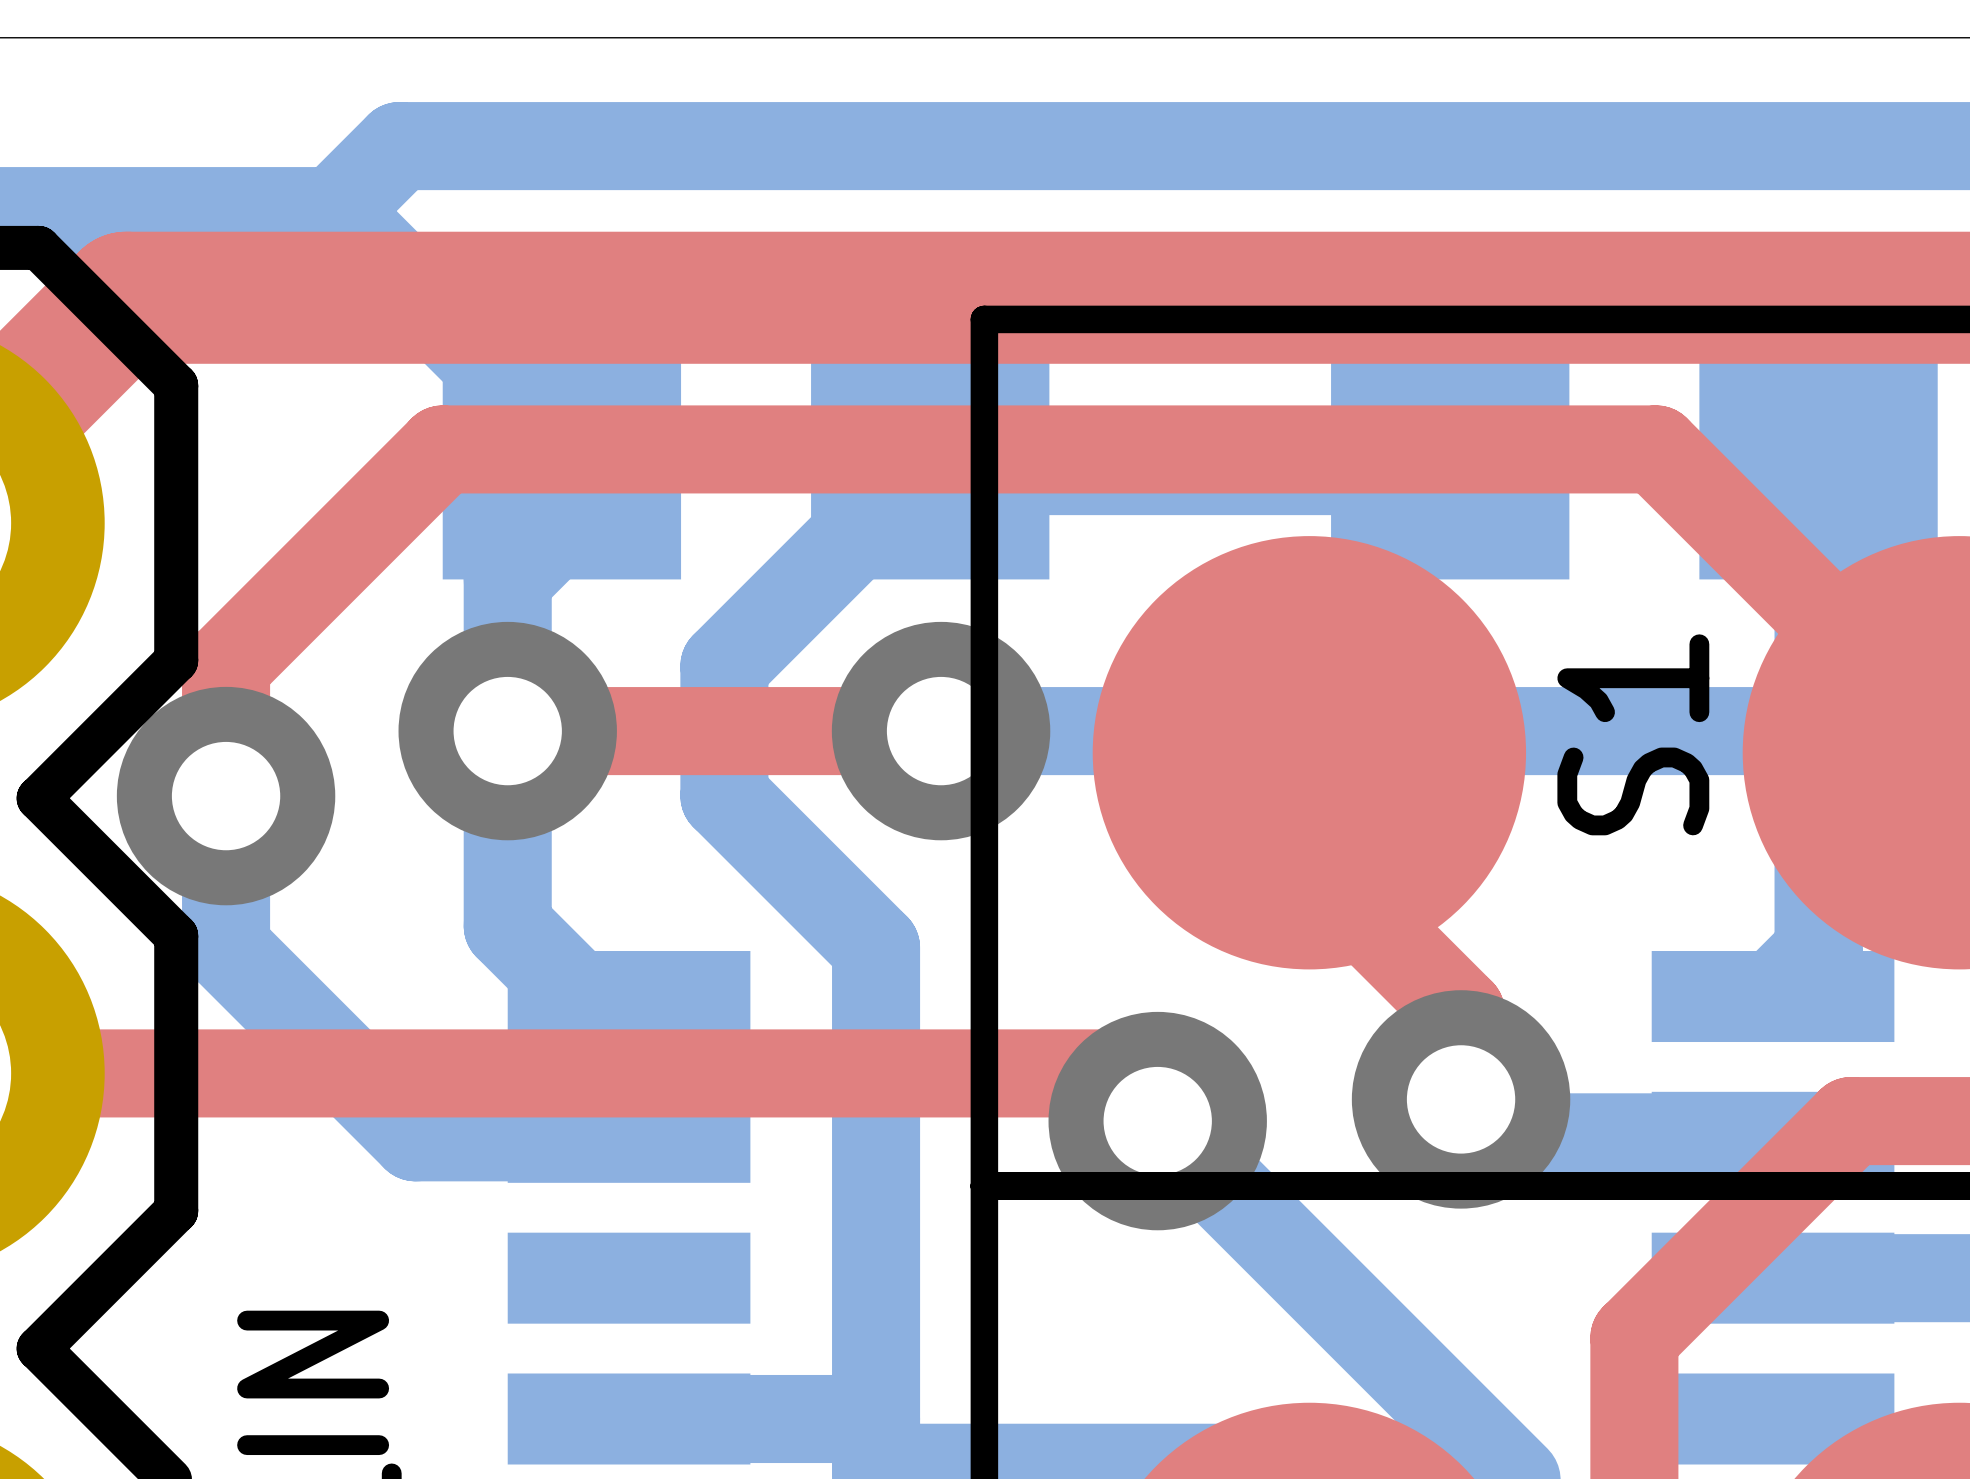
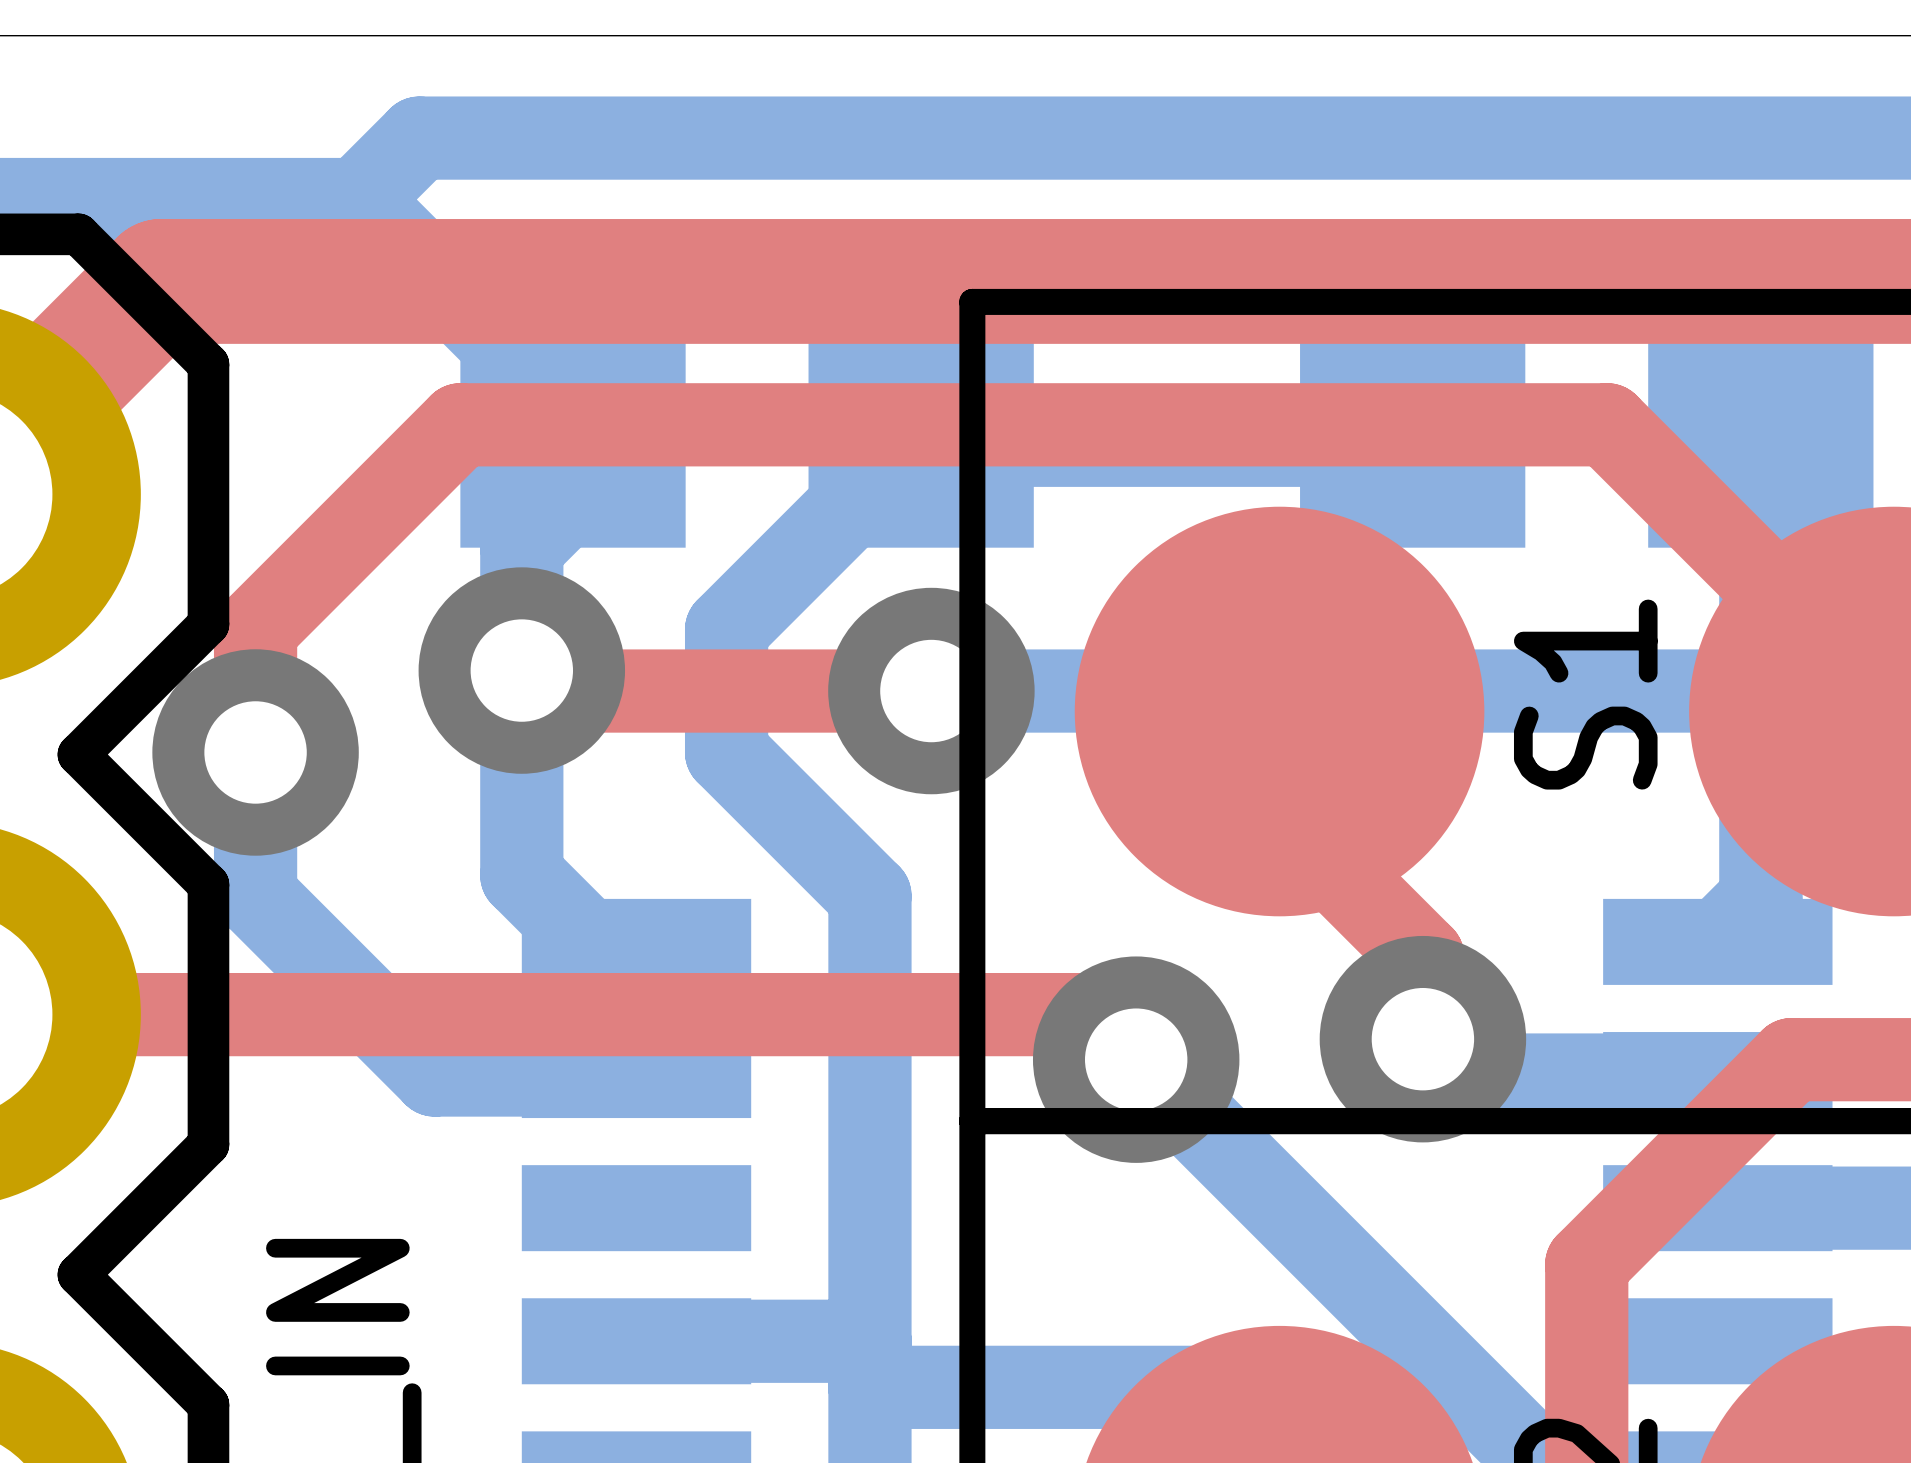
via position: (507, 731) -> (521, 670)

